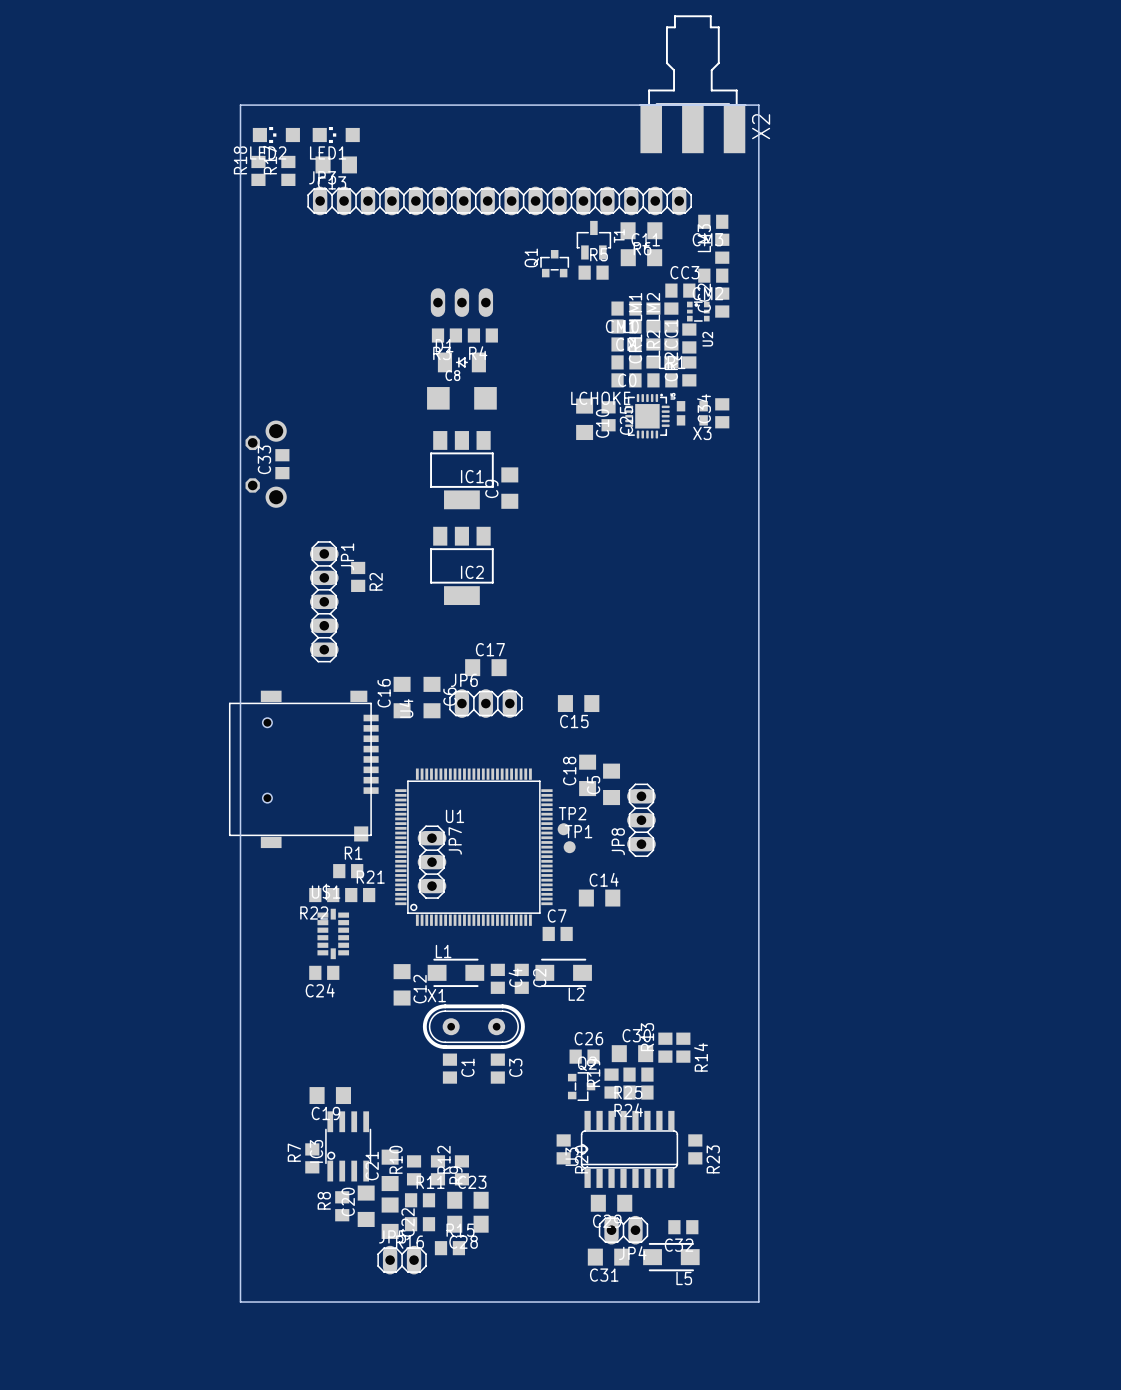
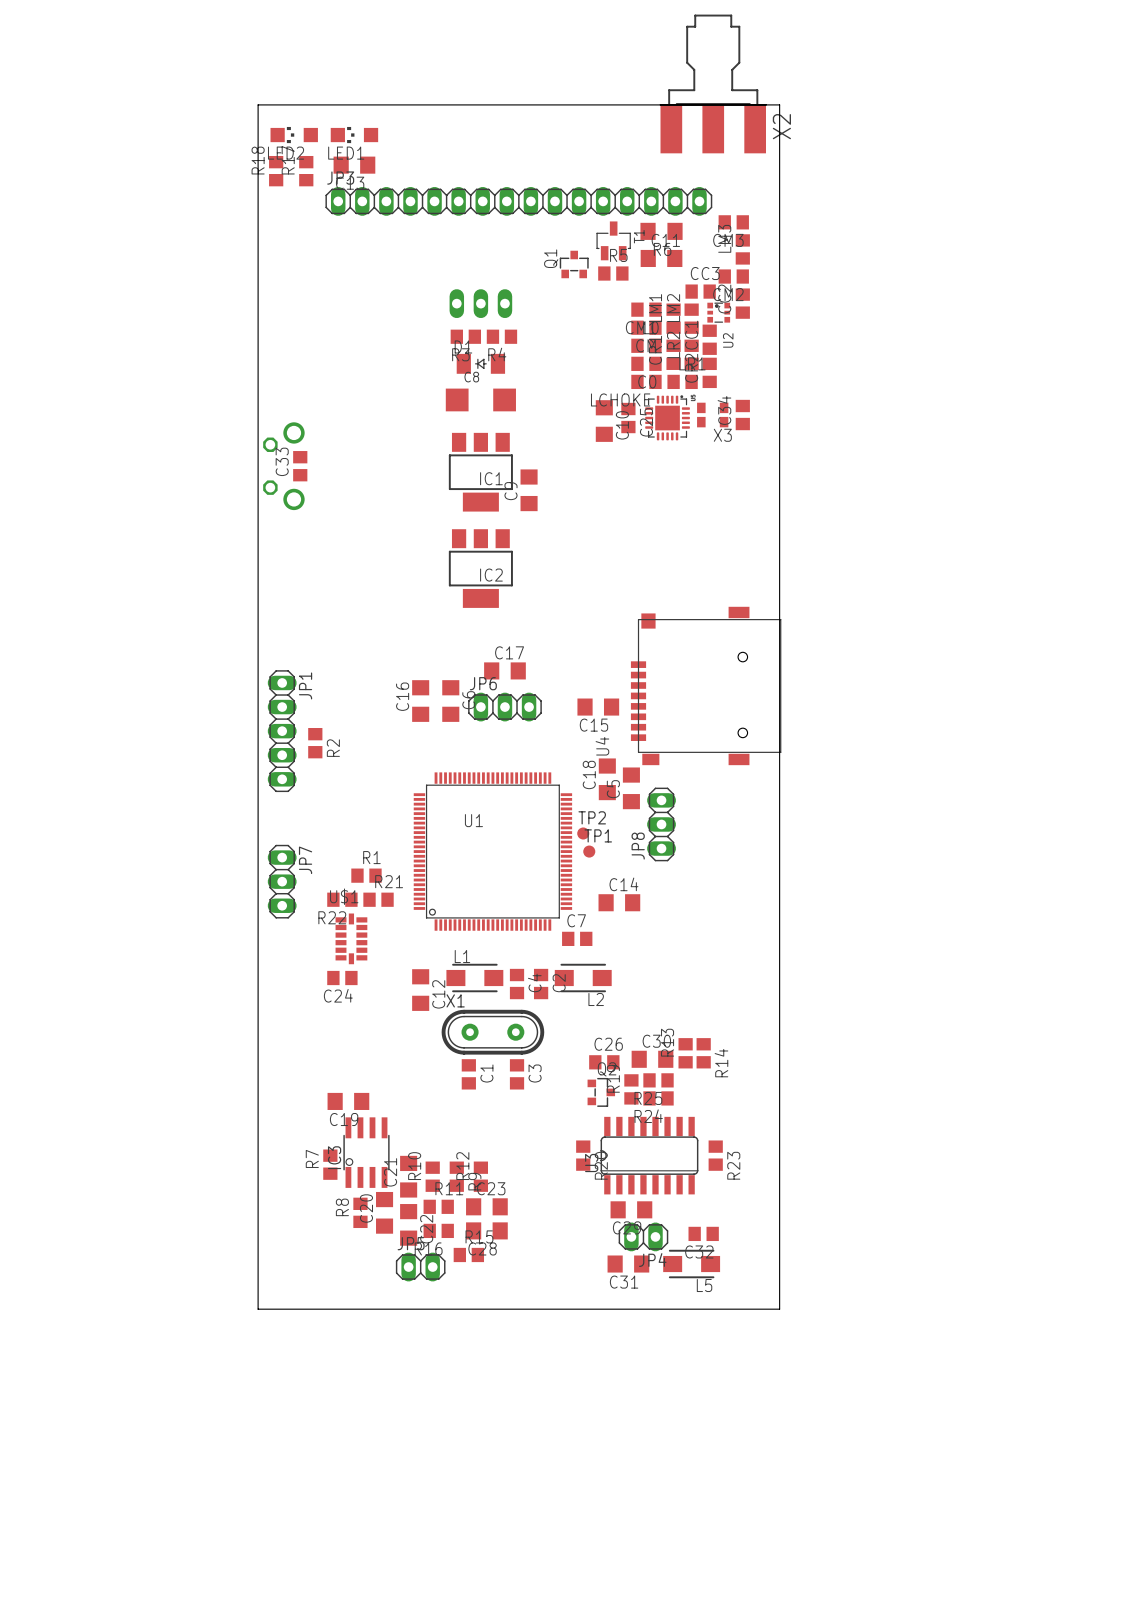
R2 position: (358, 576) -> (315, 743)
JP1 position: (324, 601) -> (282, 731)
U4 rotation: 0° (303, 769) -> 180° (706, 685)
U4 position: (303, 769) -> (706, 685)
JP7 position: (432, 862) -> (282, 881)

